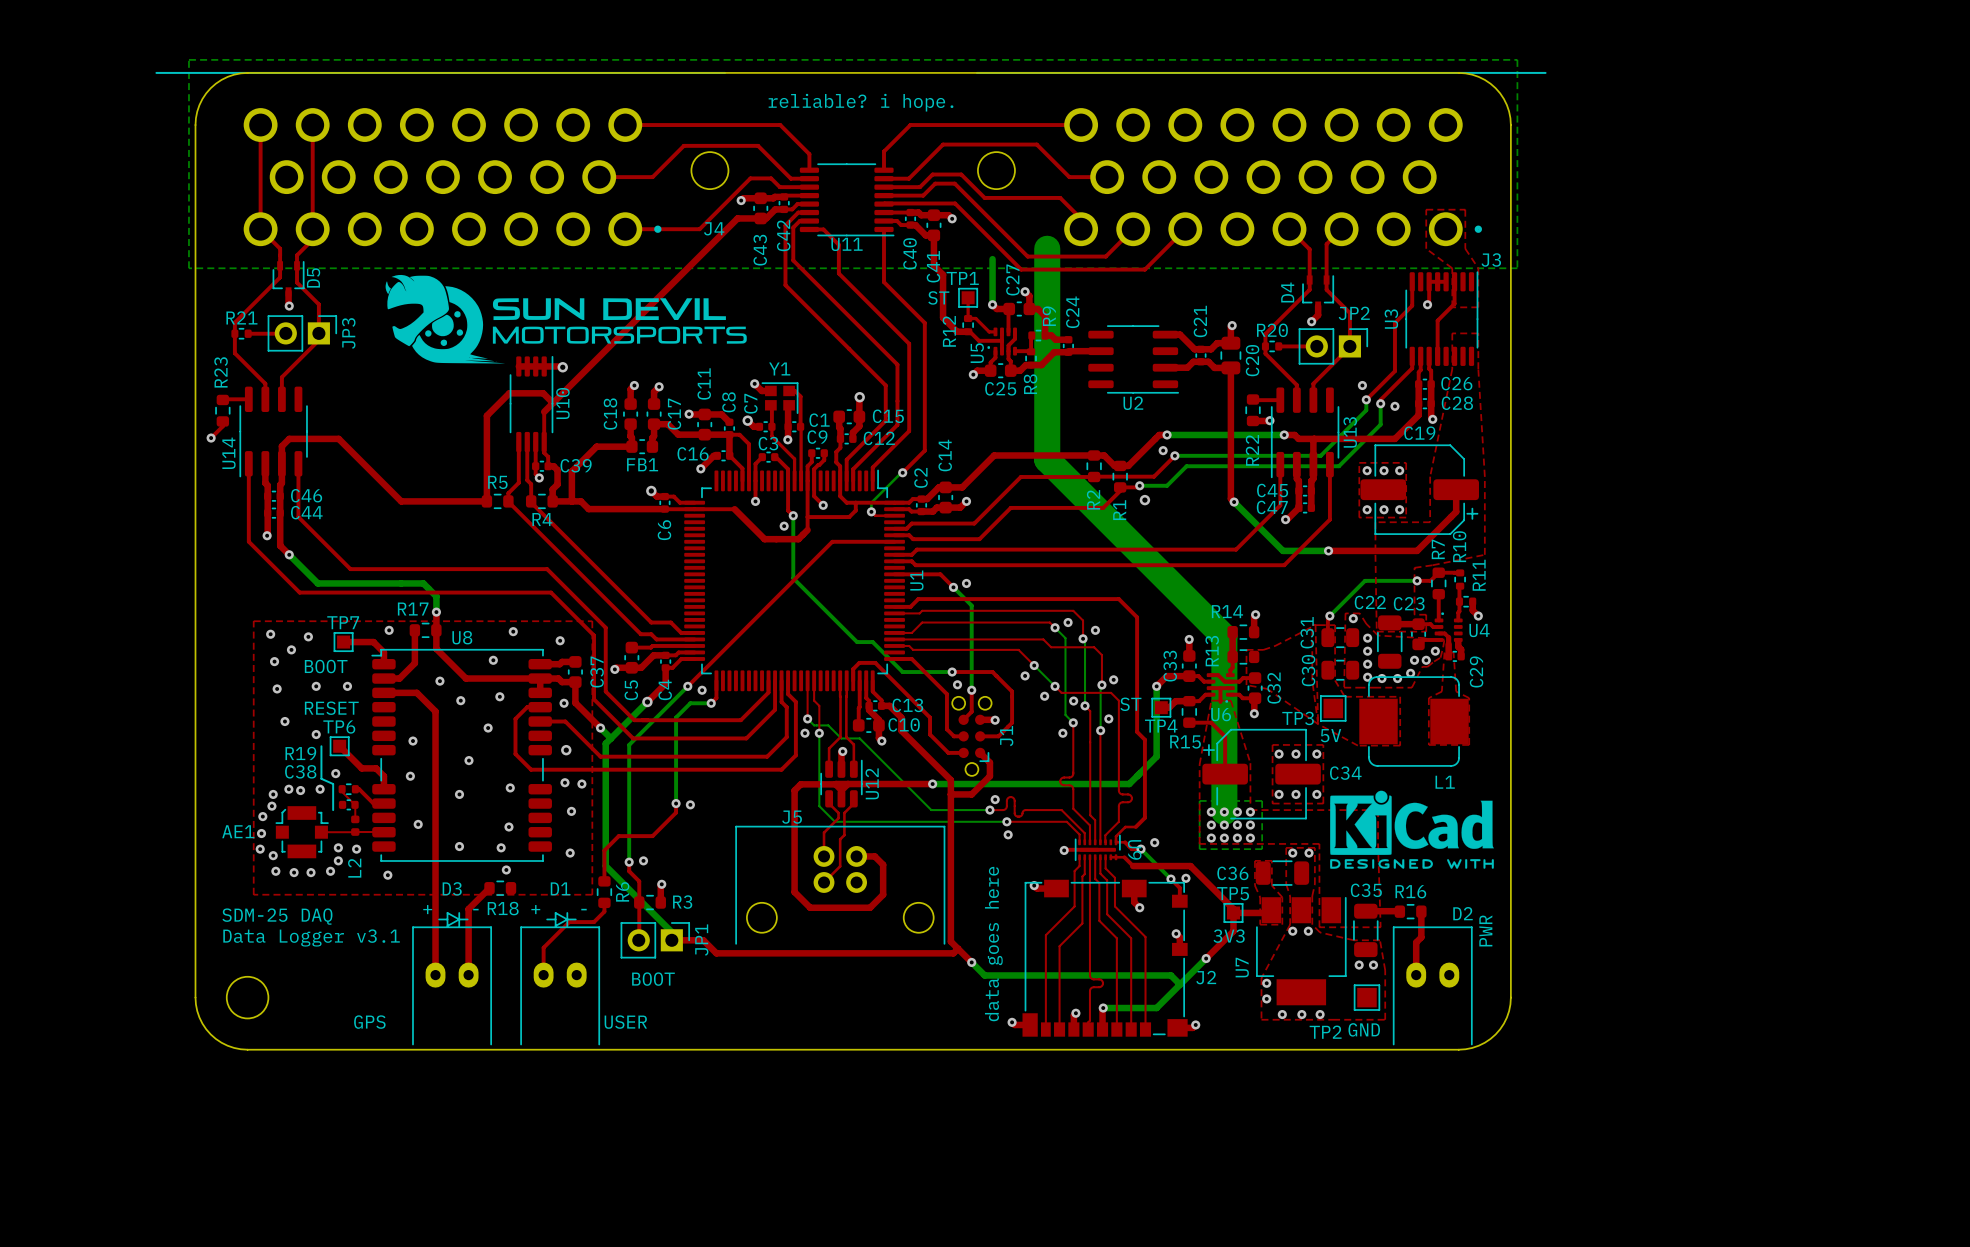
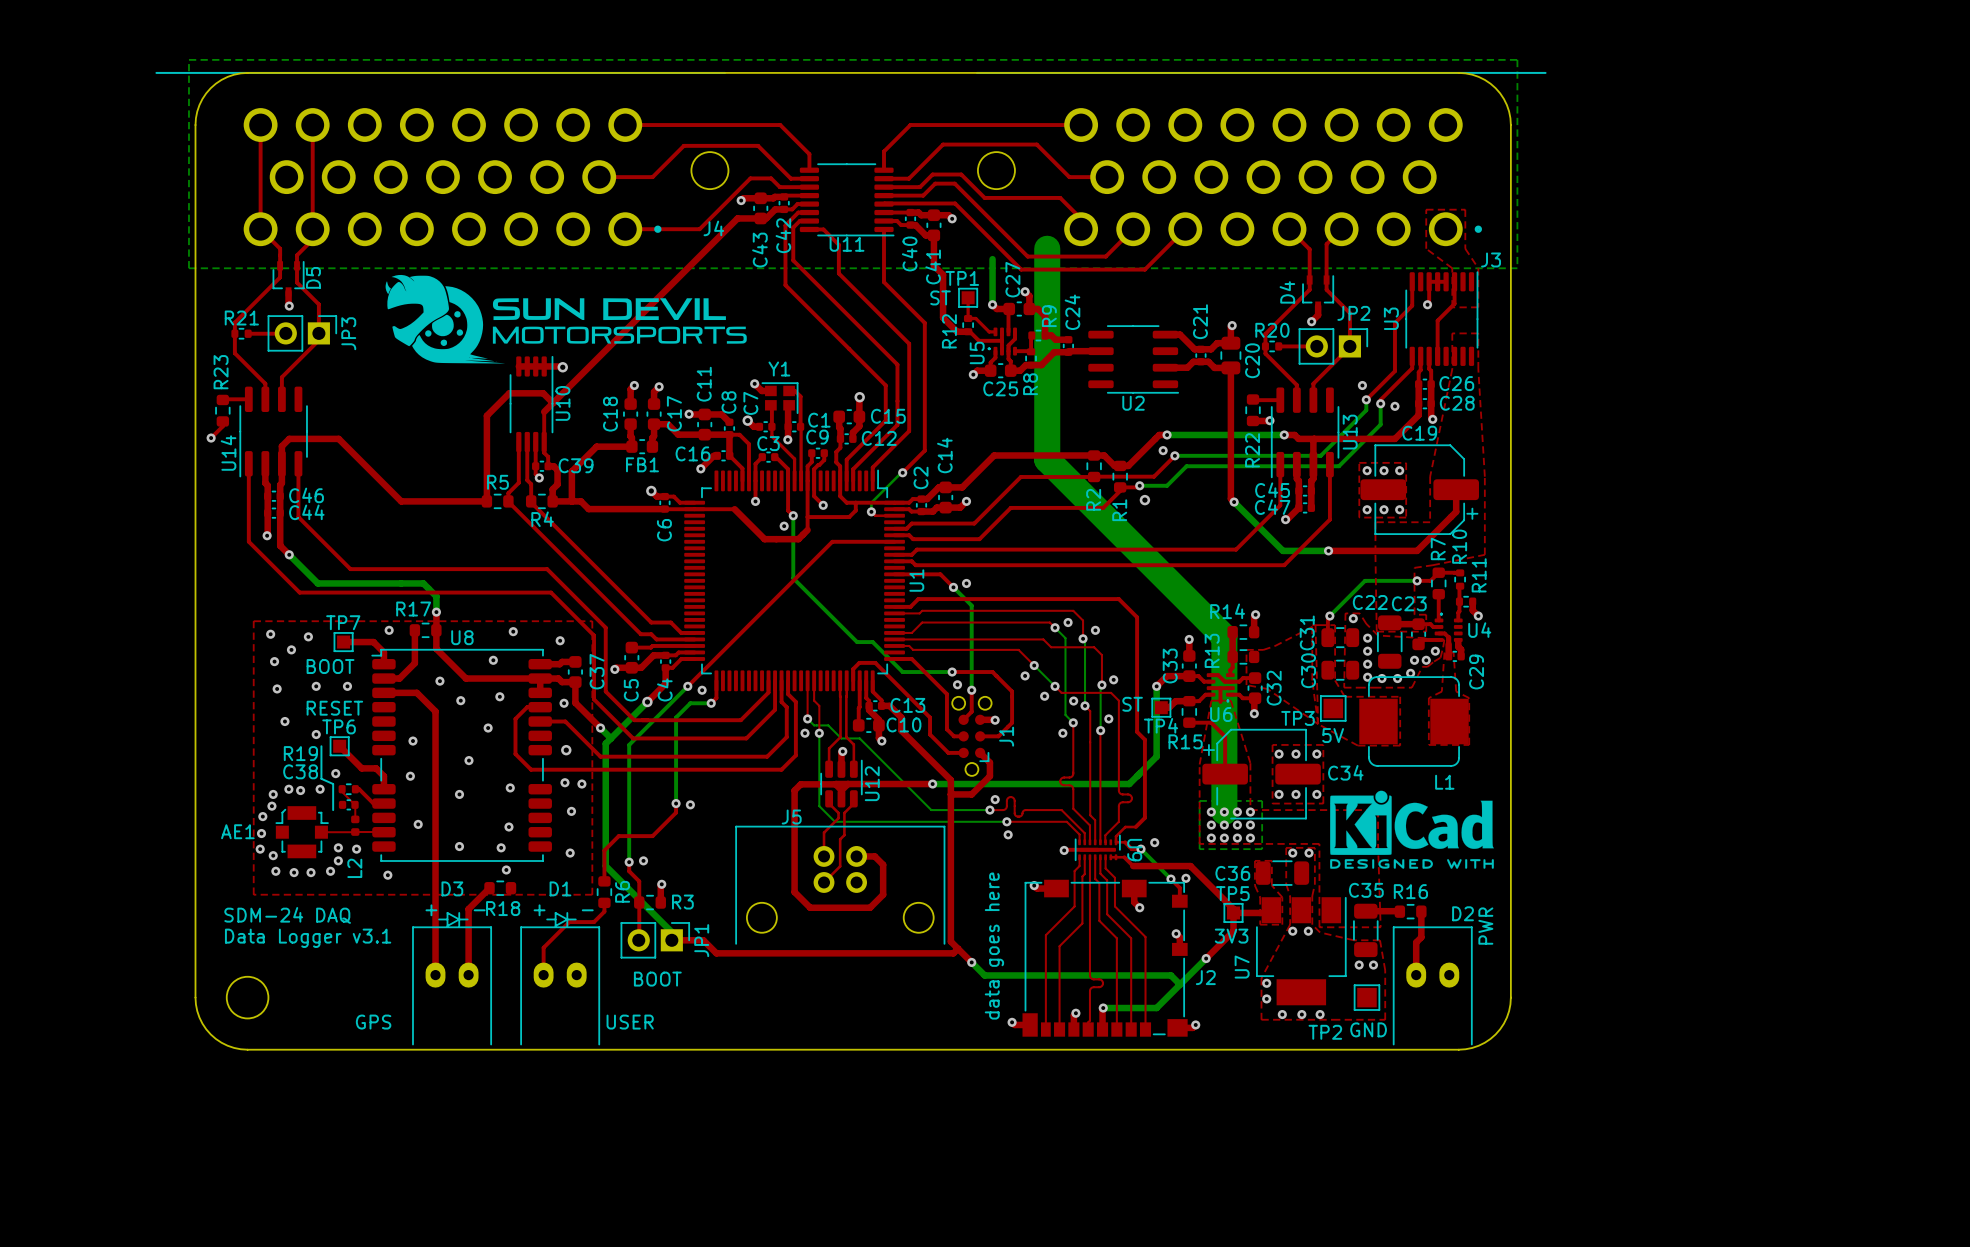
text: reliable? i hope. (861, 102) -> none
text: SDM-25 DAQ (277, 916) -> SDM-24 DAQ (287, 915)

